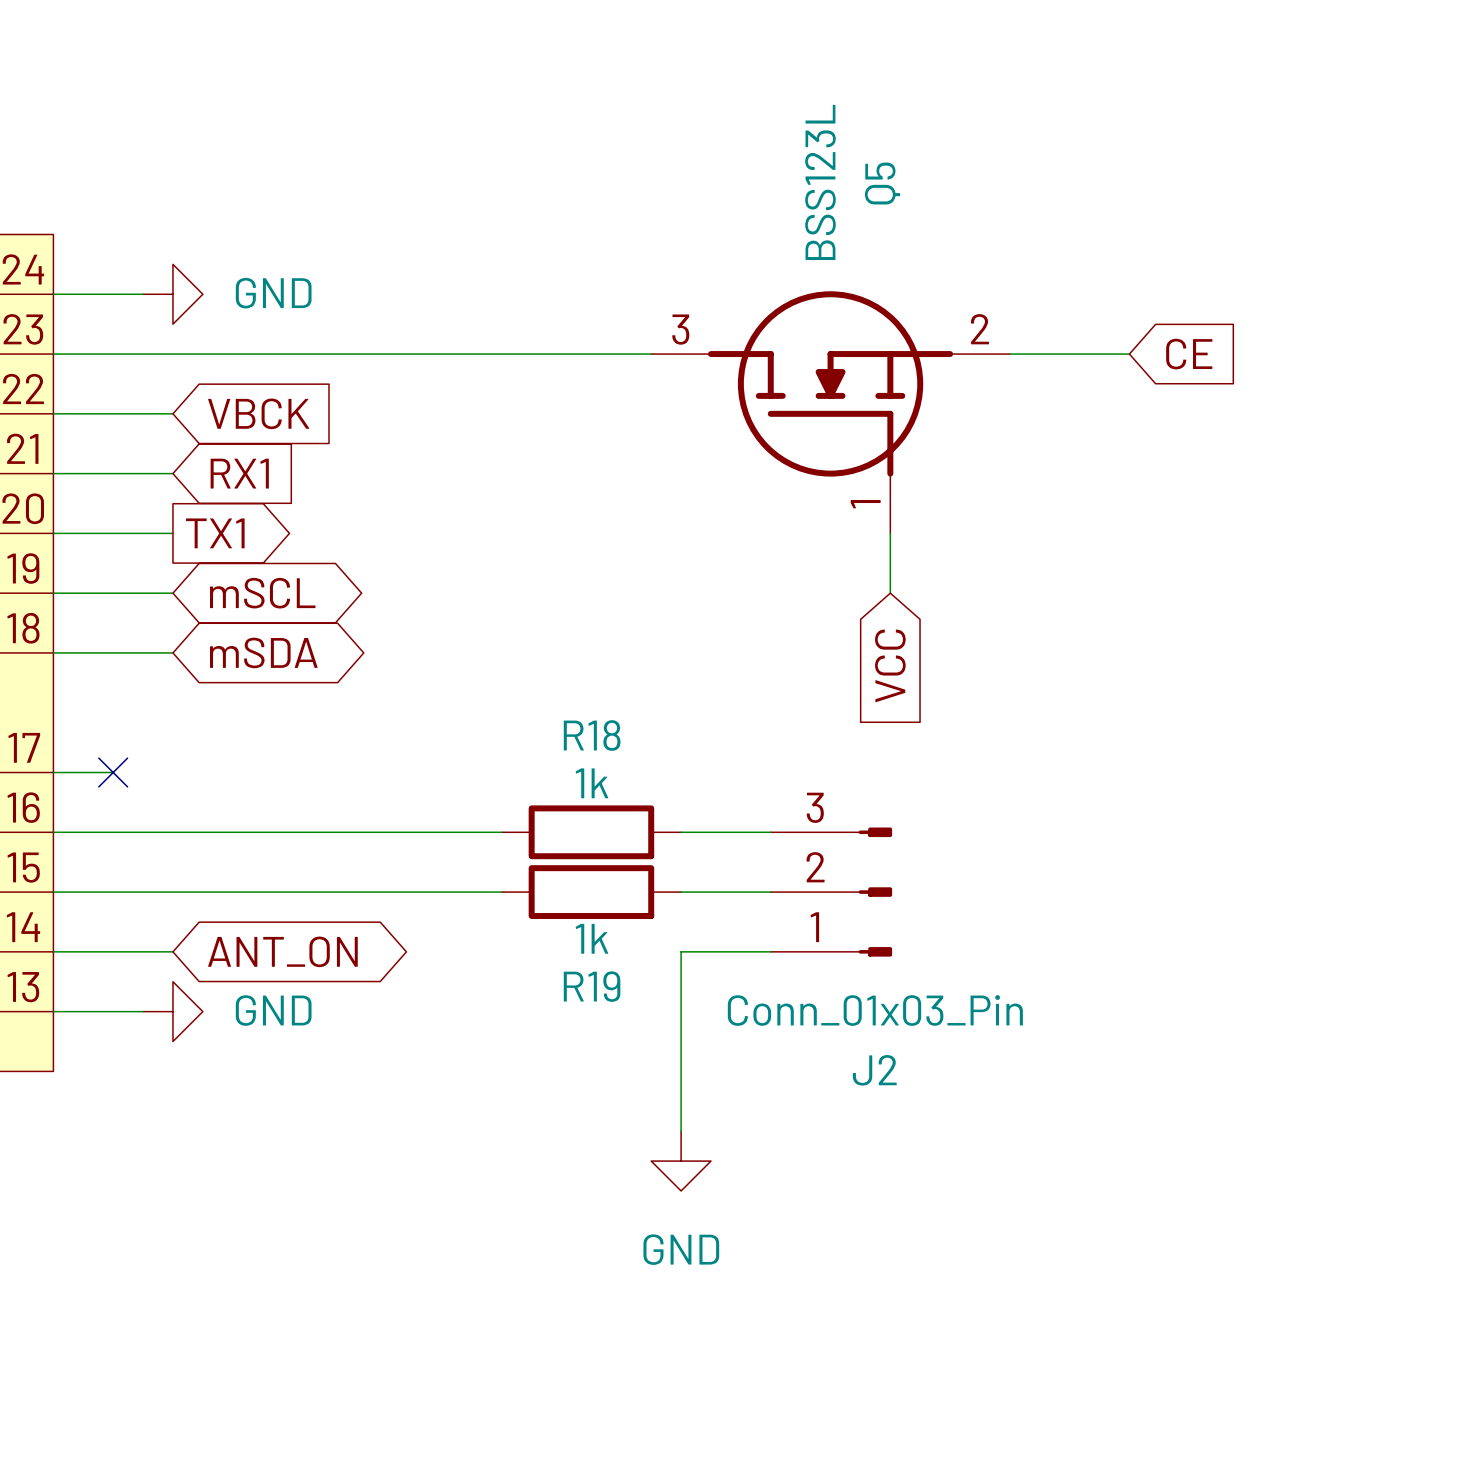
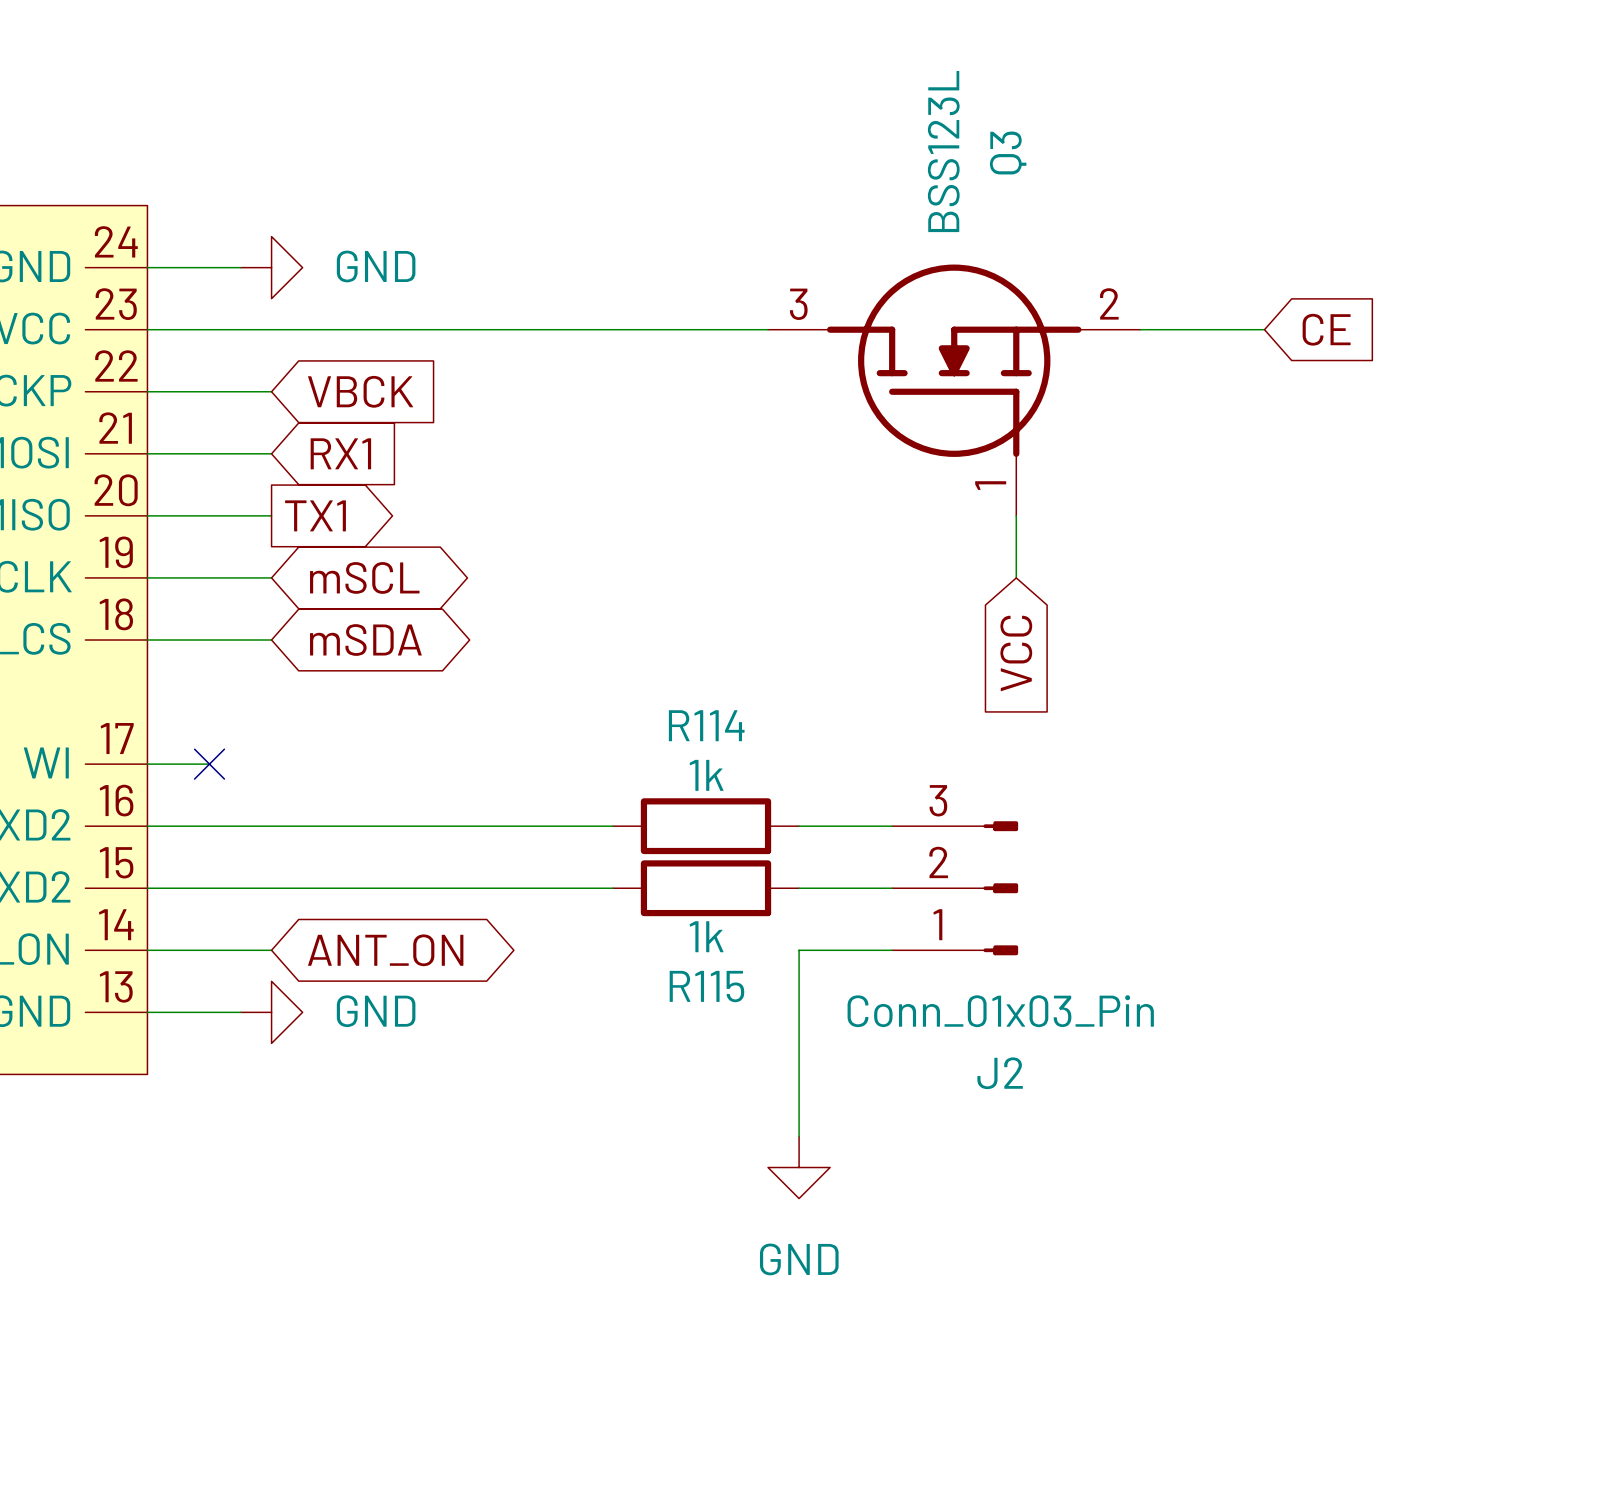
Q5 name: Q5 (882, 183) -> Q3 (1008, 152)
R18 name: R18 (592, 735) -> R114 (706, 725)
R19 name: R19 (592, 986) -> R115 (706, 986)

